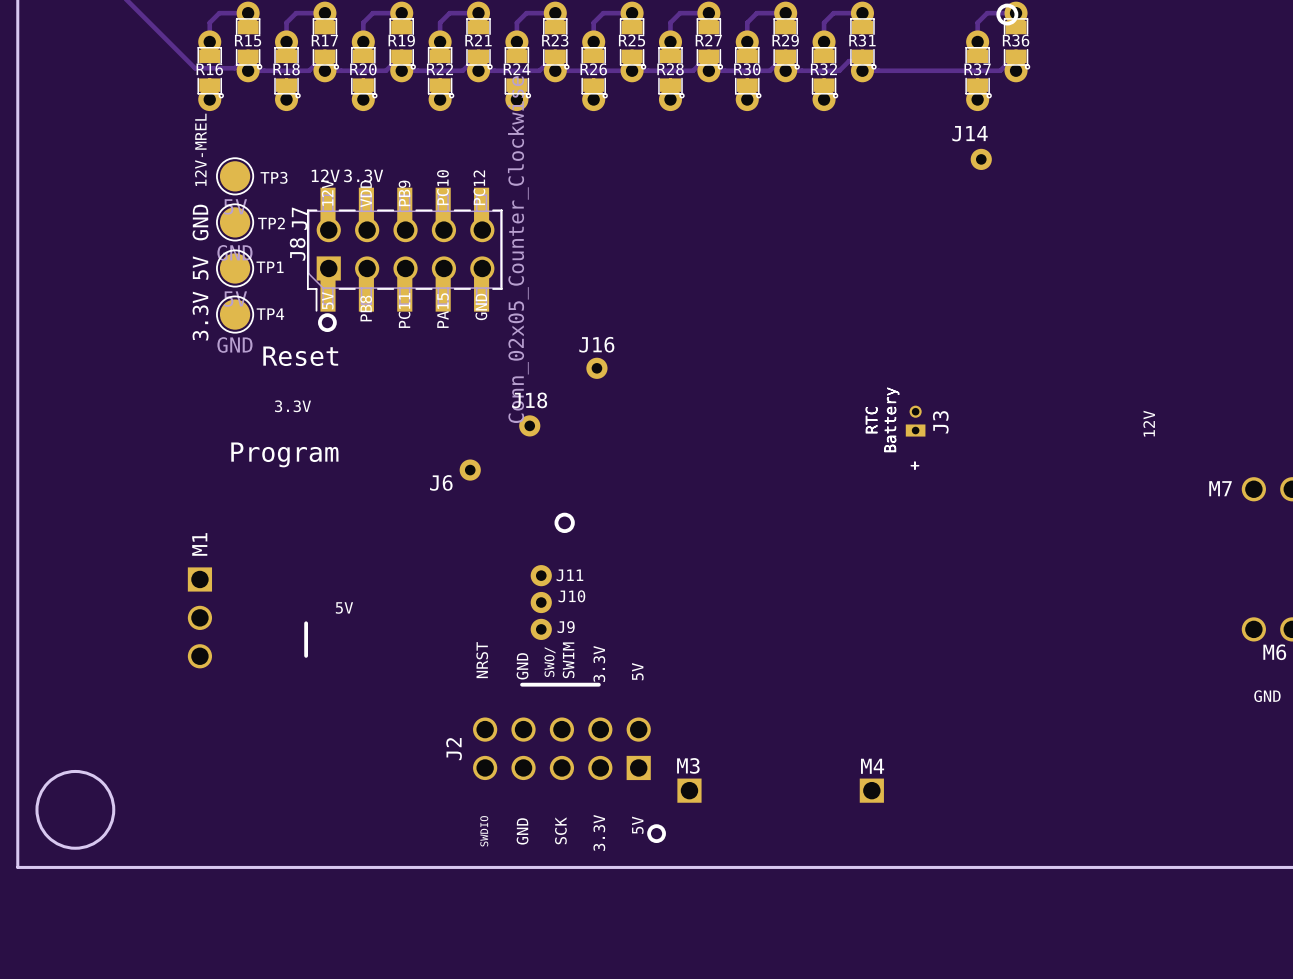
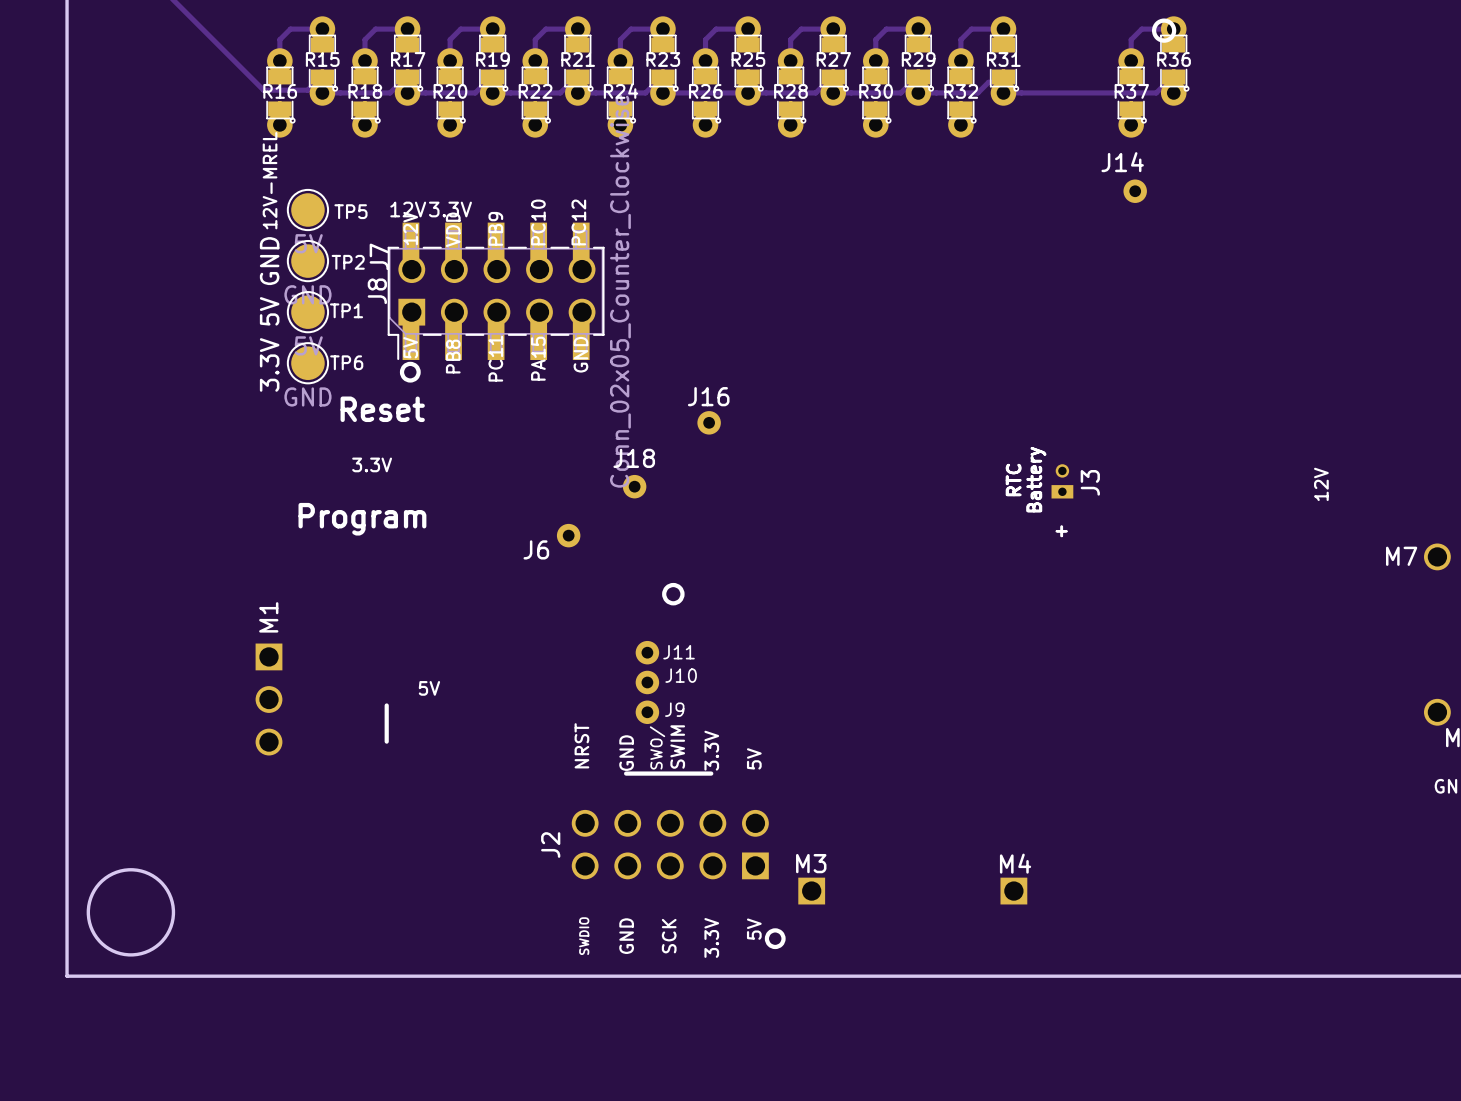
TP3 name: TP3 (274, 177) -> TP5 (350, 211)
TP4 name: TP4 (270, 314) -> TP6 (346, 362)

